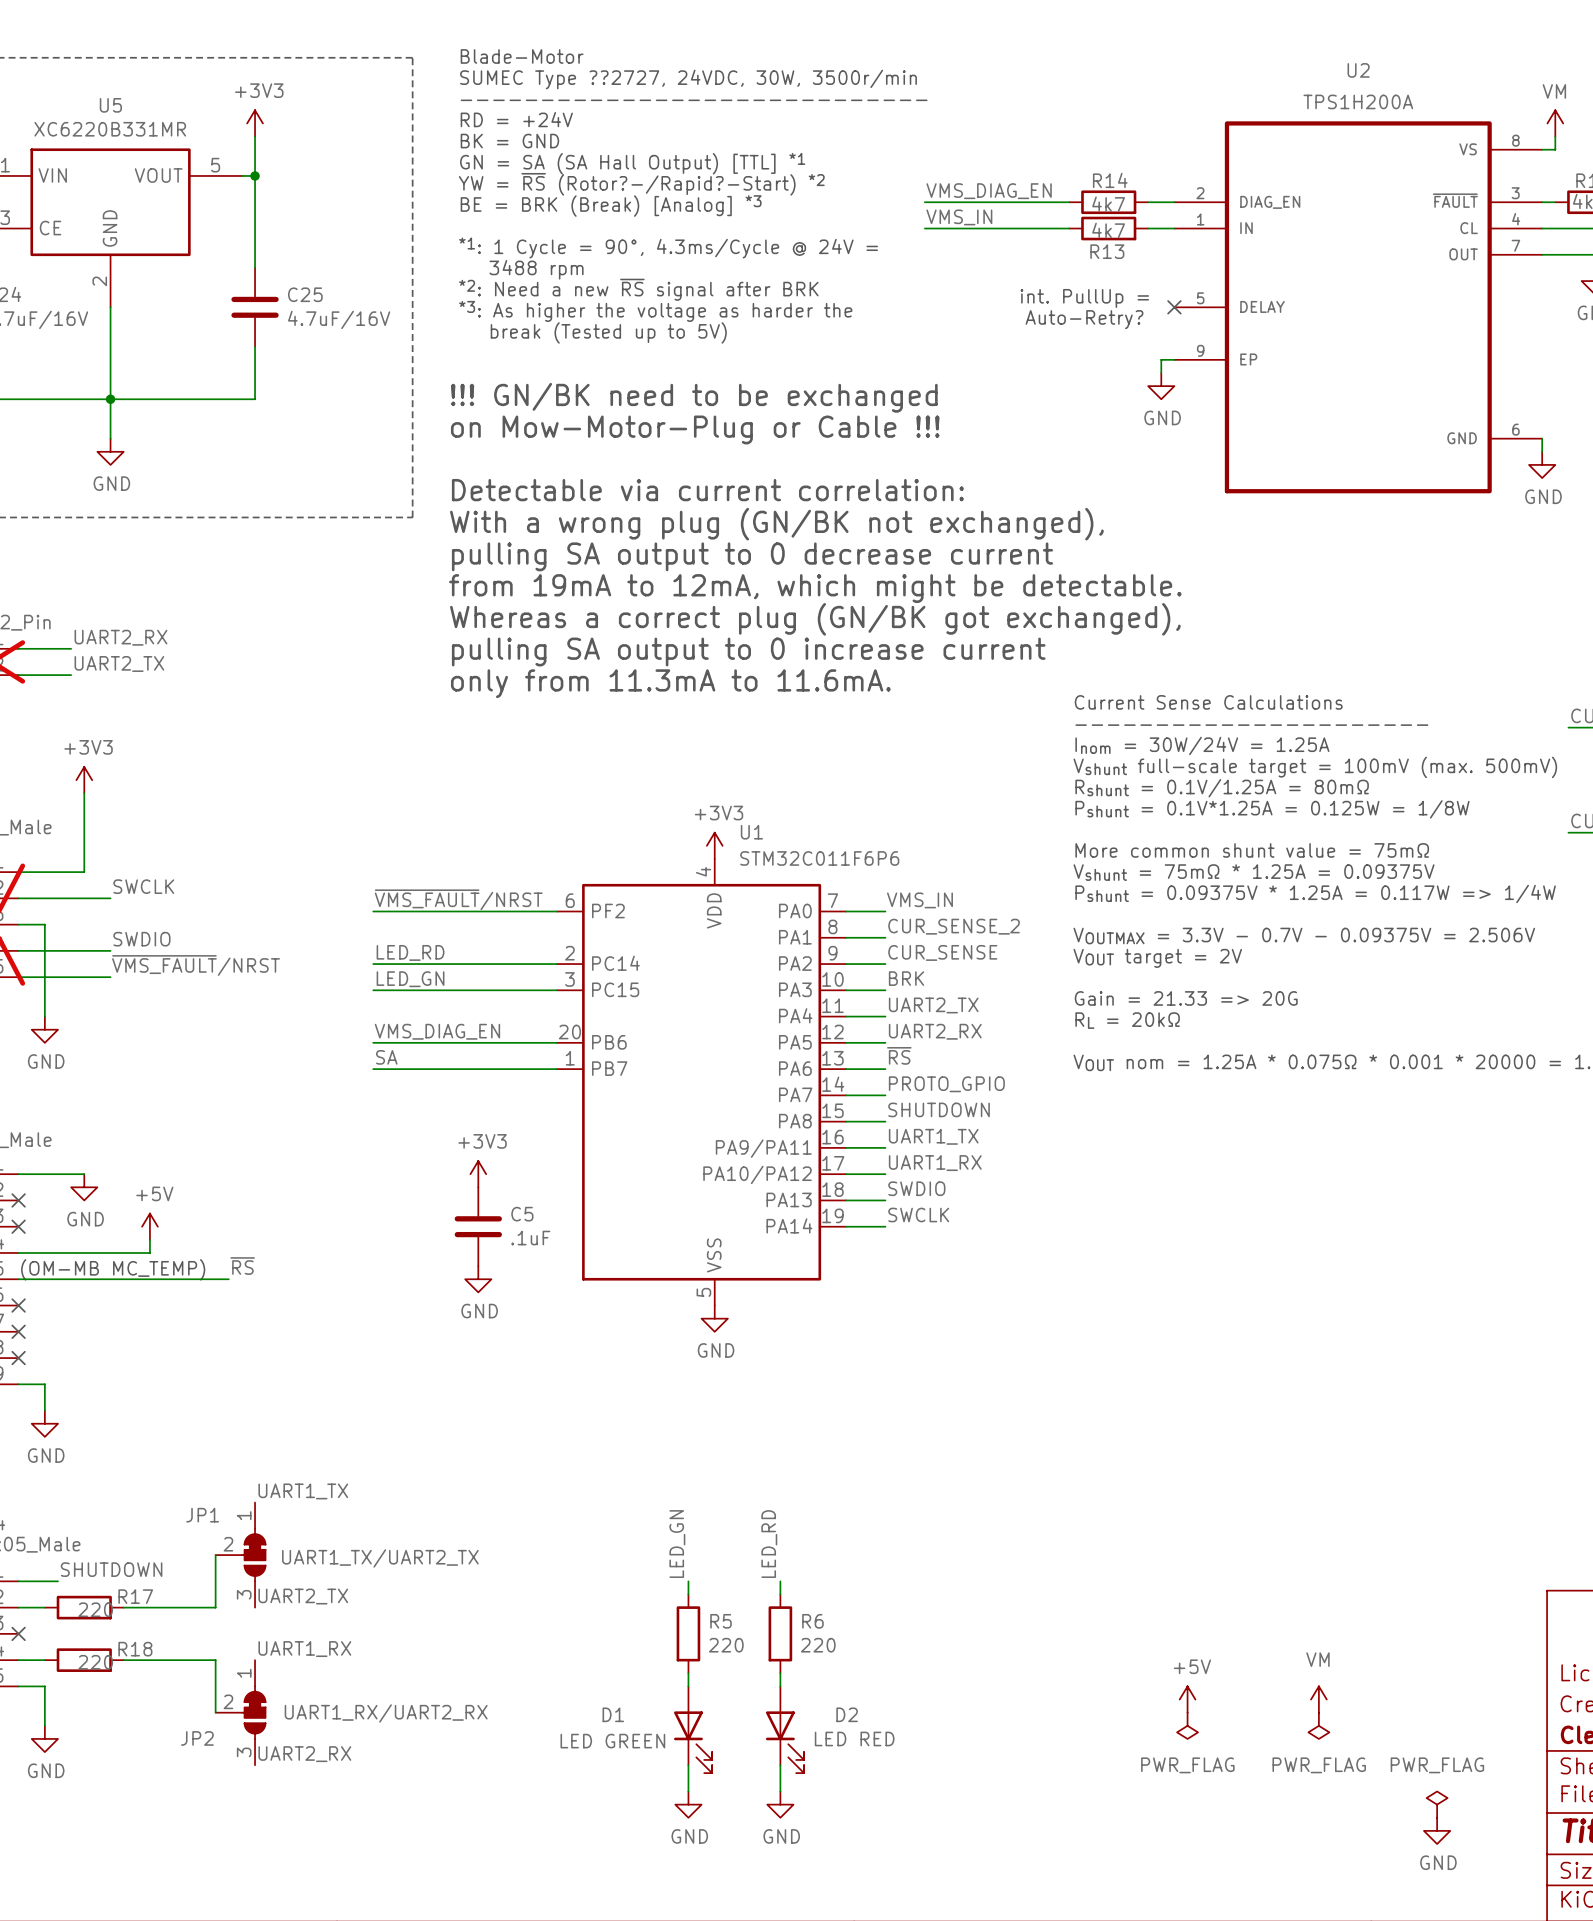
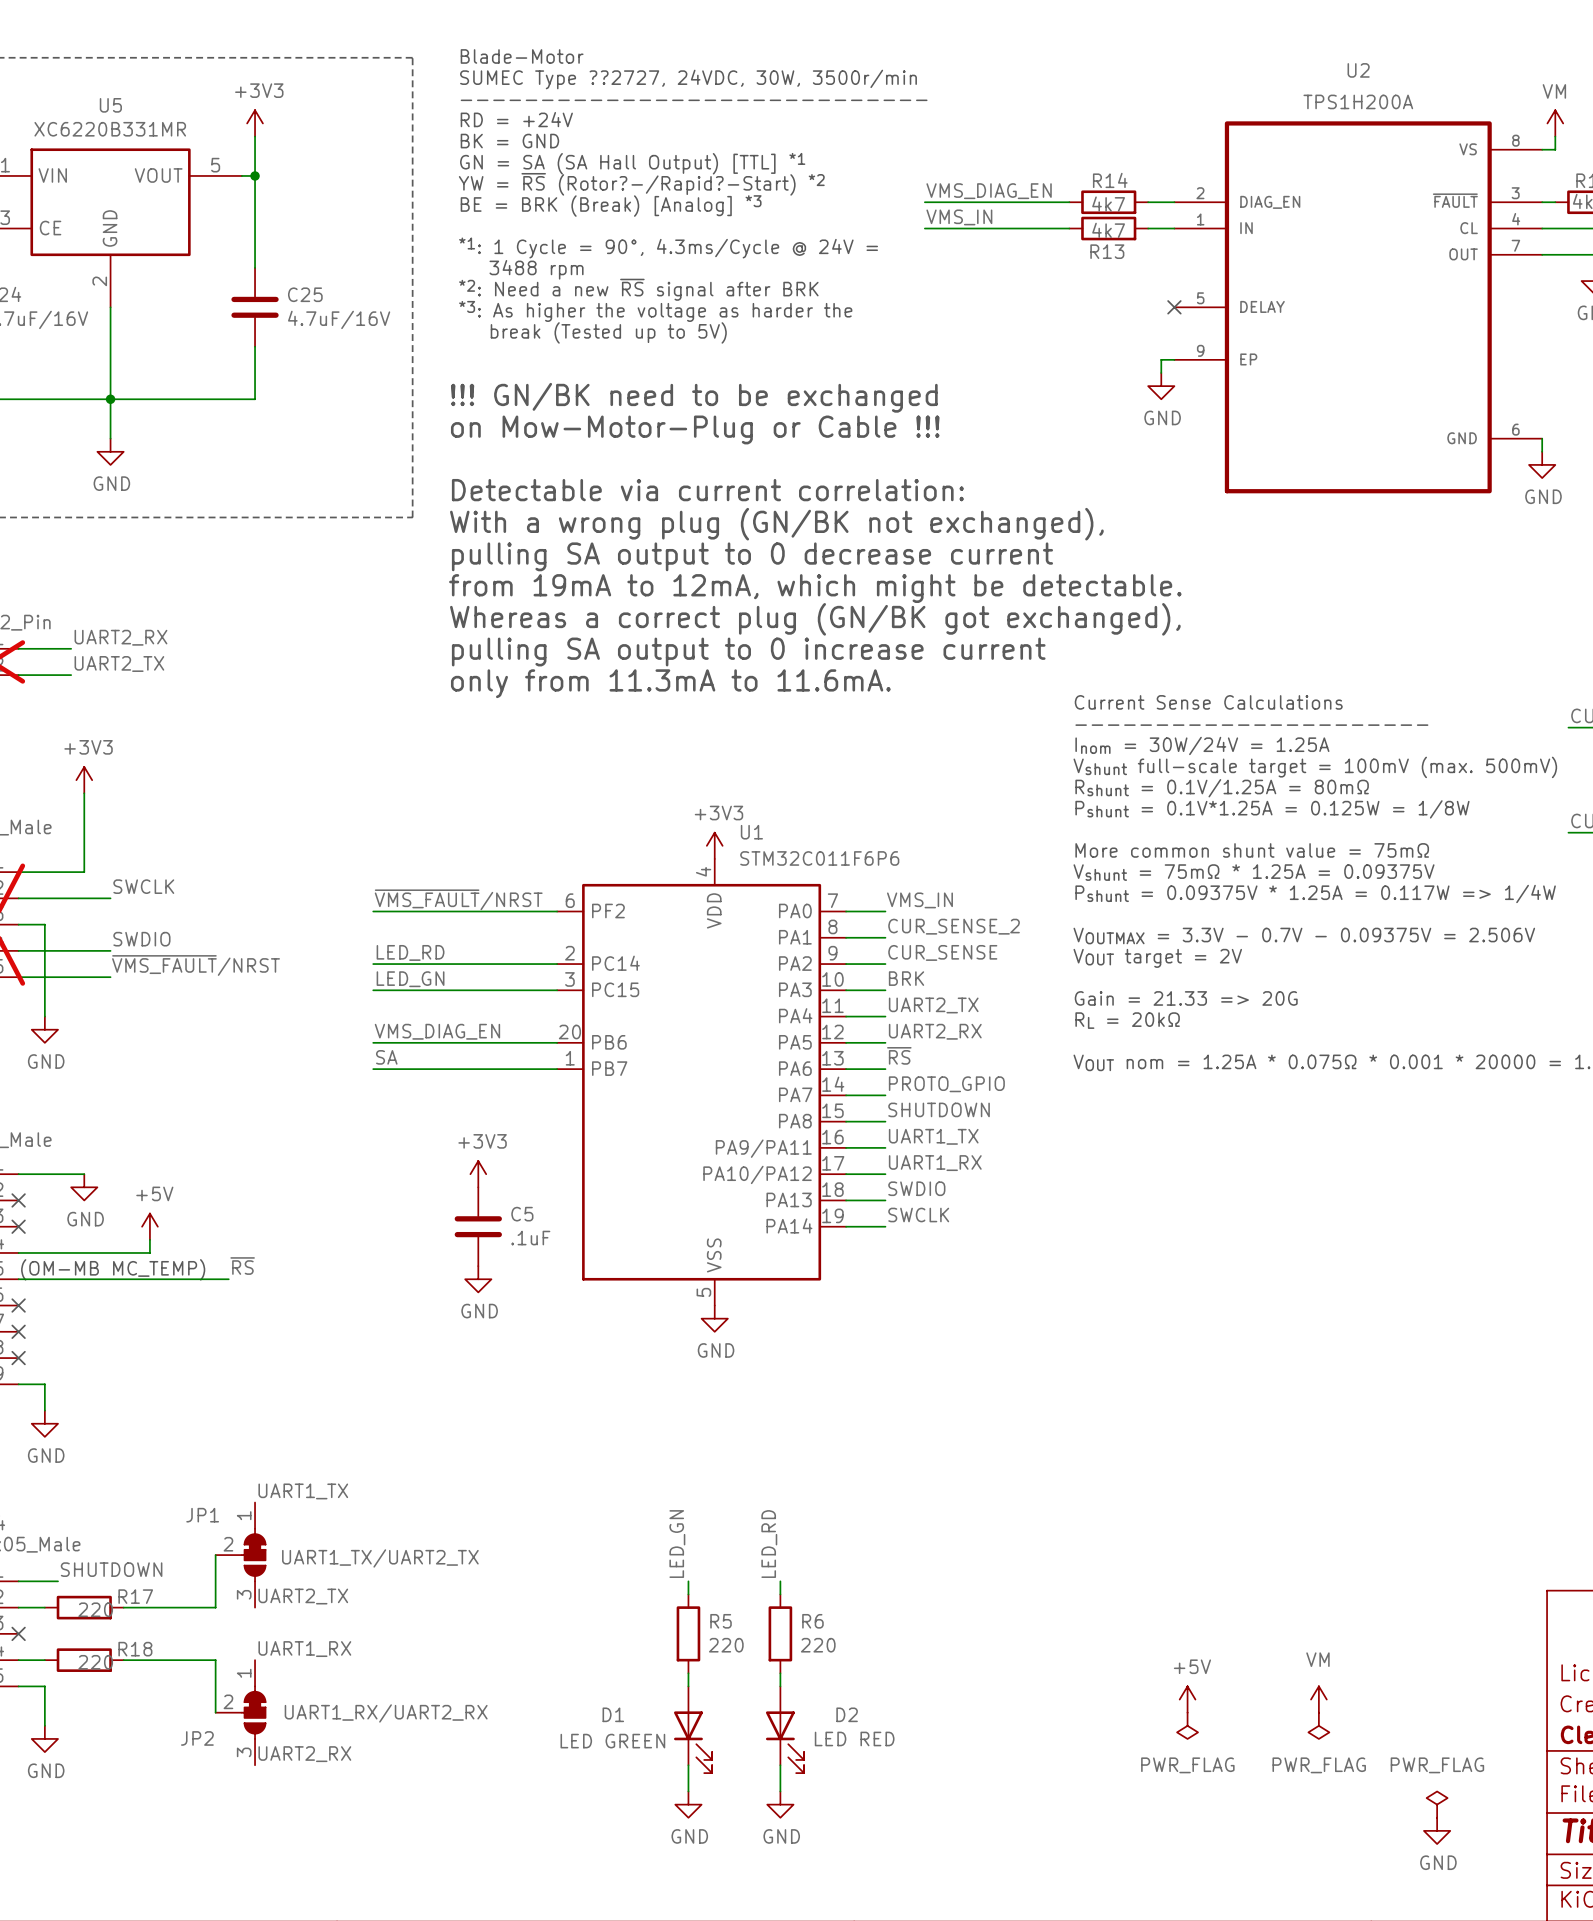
text: int. PullUp = (1084, 298) -> none
text: Auto-Retry? (1084, 319) -> none

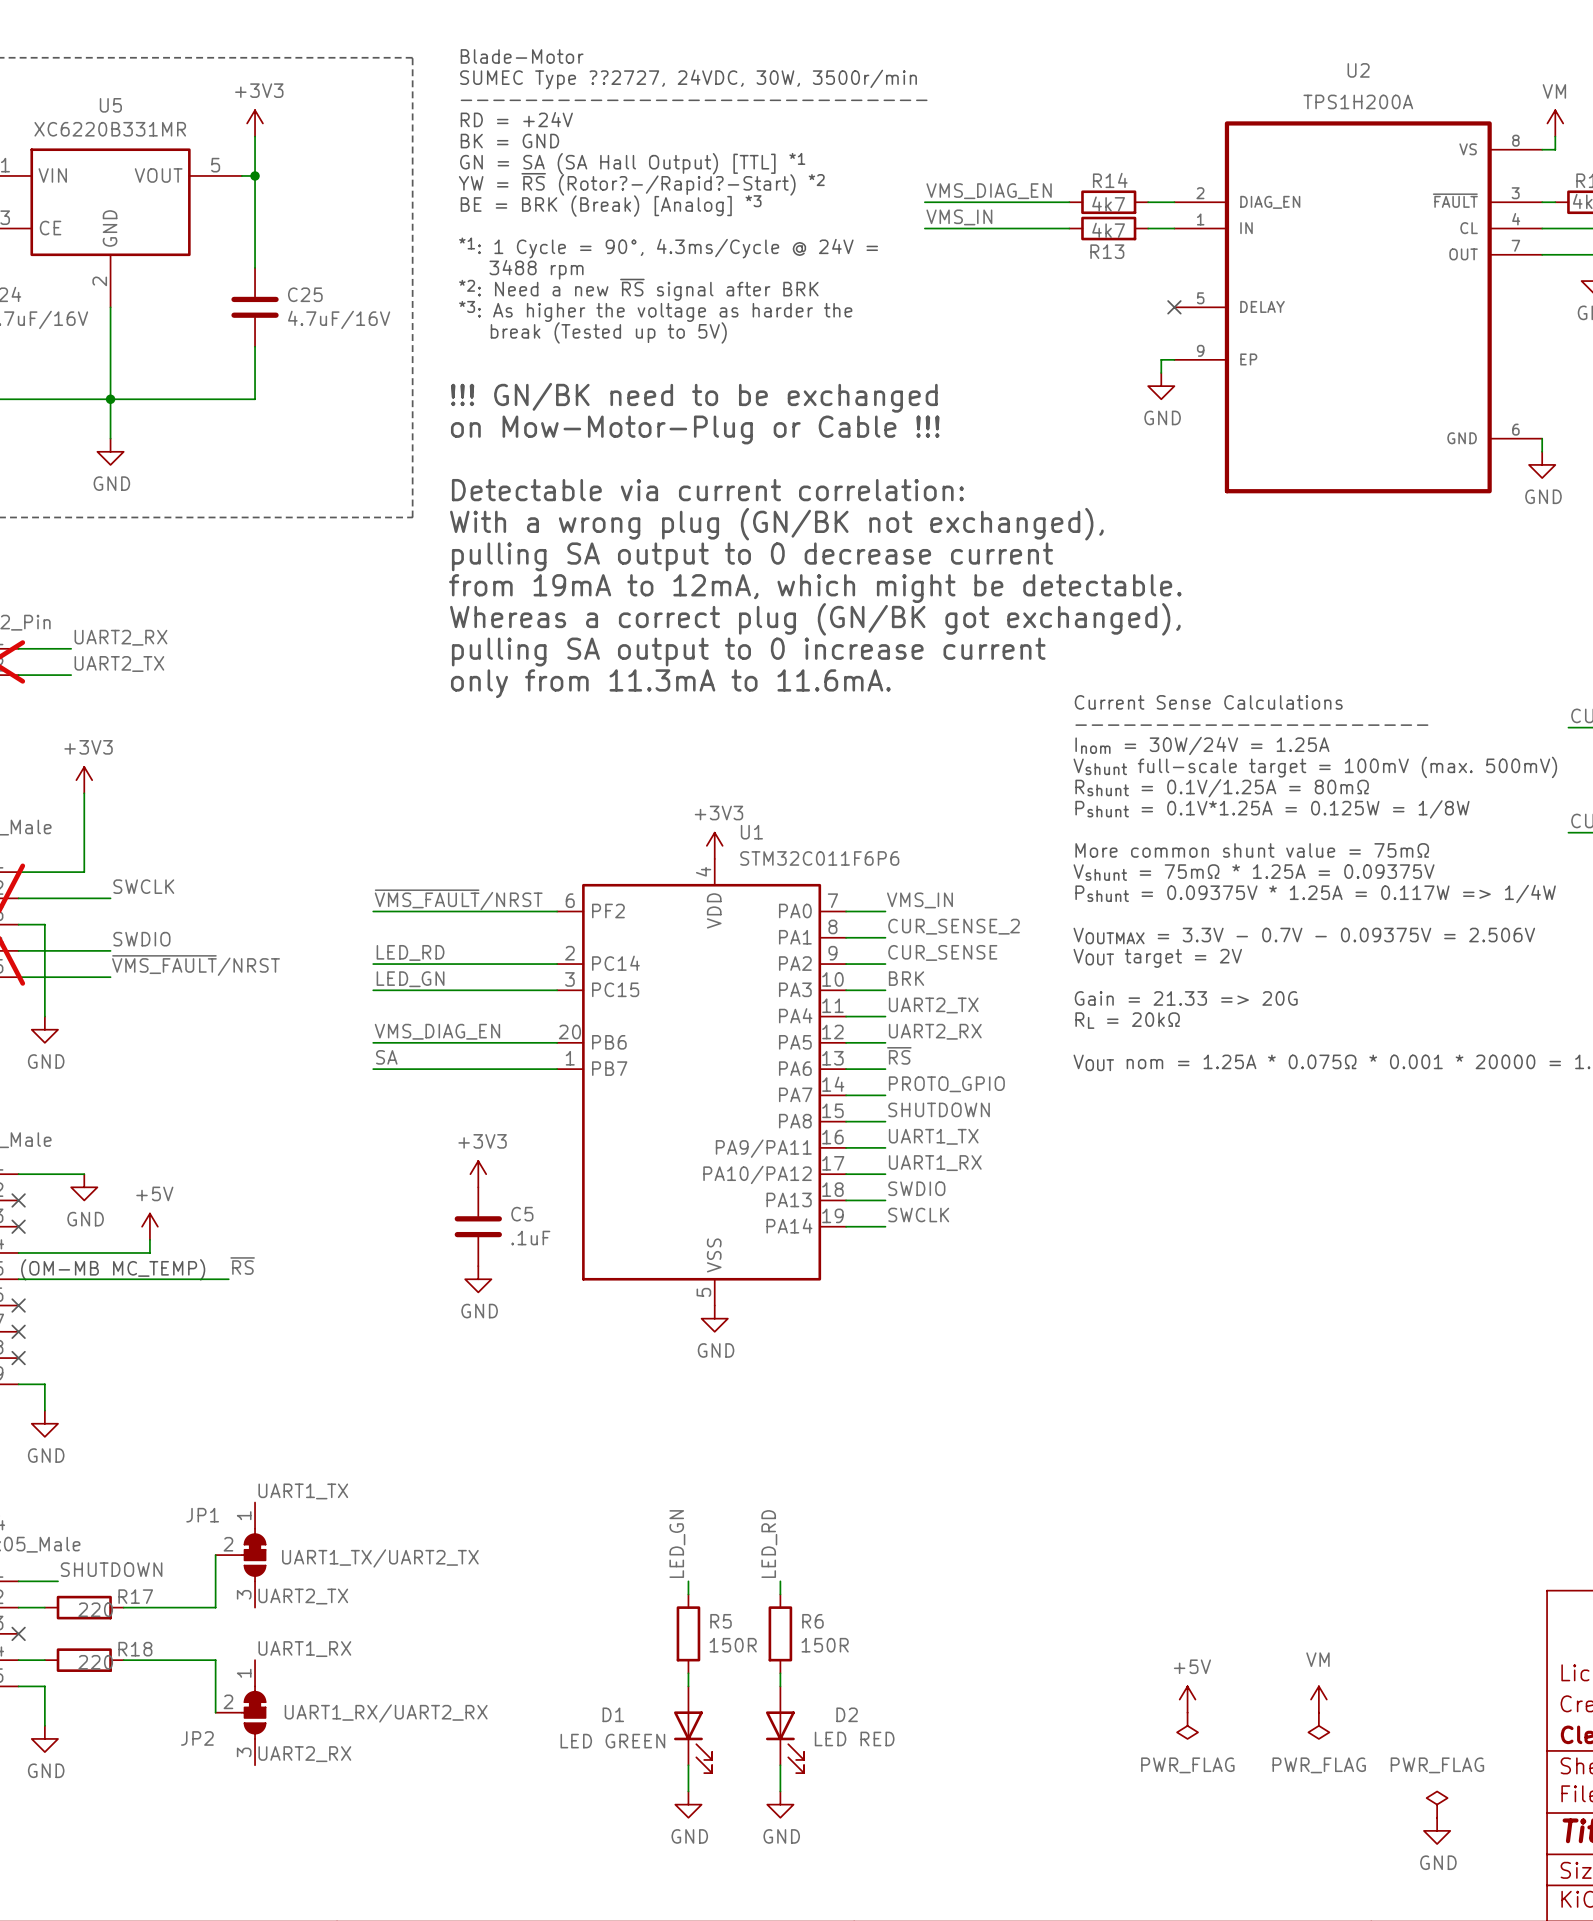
R5 value: 220 (726, 1645) -> 150R (733, 1645)
R6 value: 220 (818, 1645) -> 150R (825, 1645)

